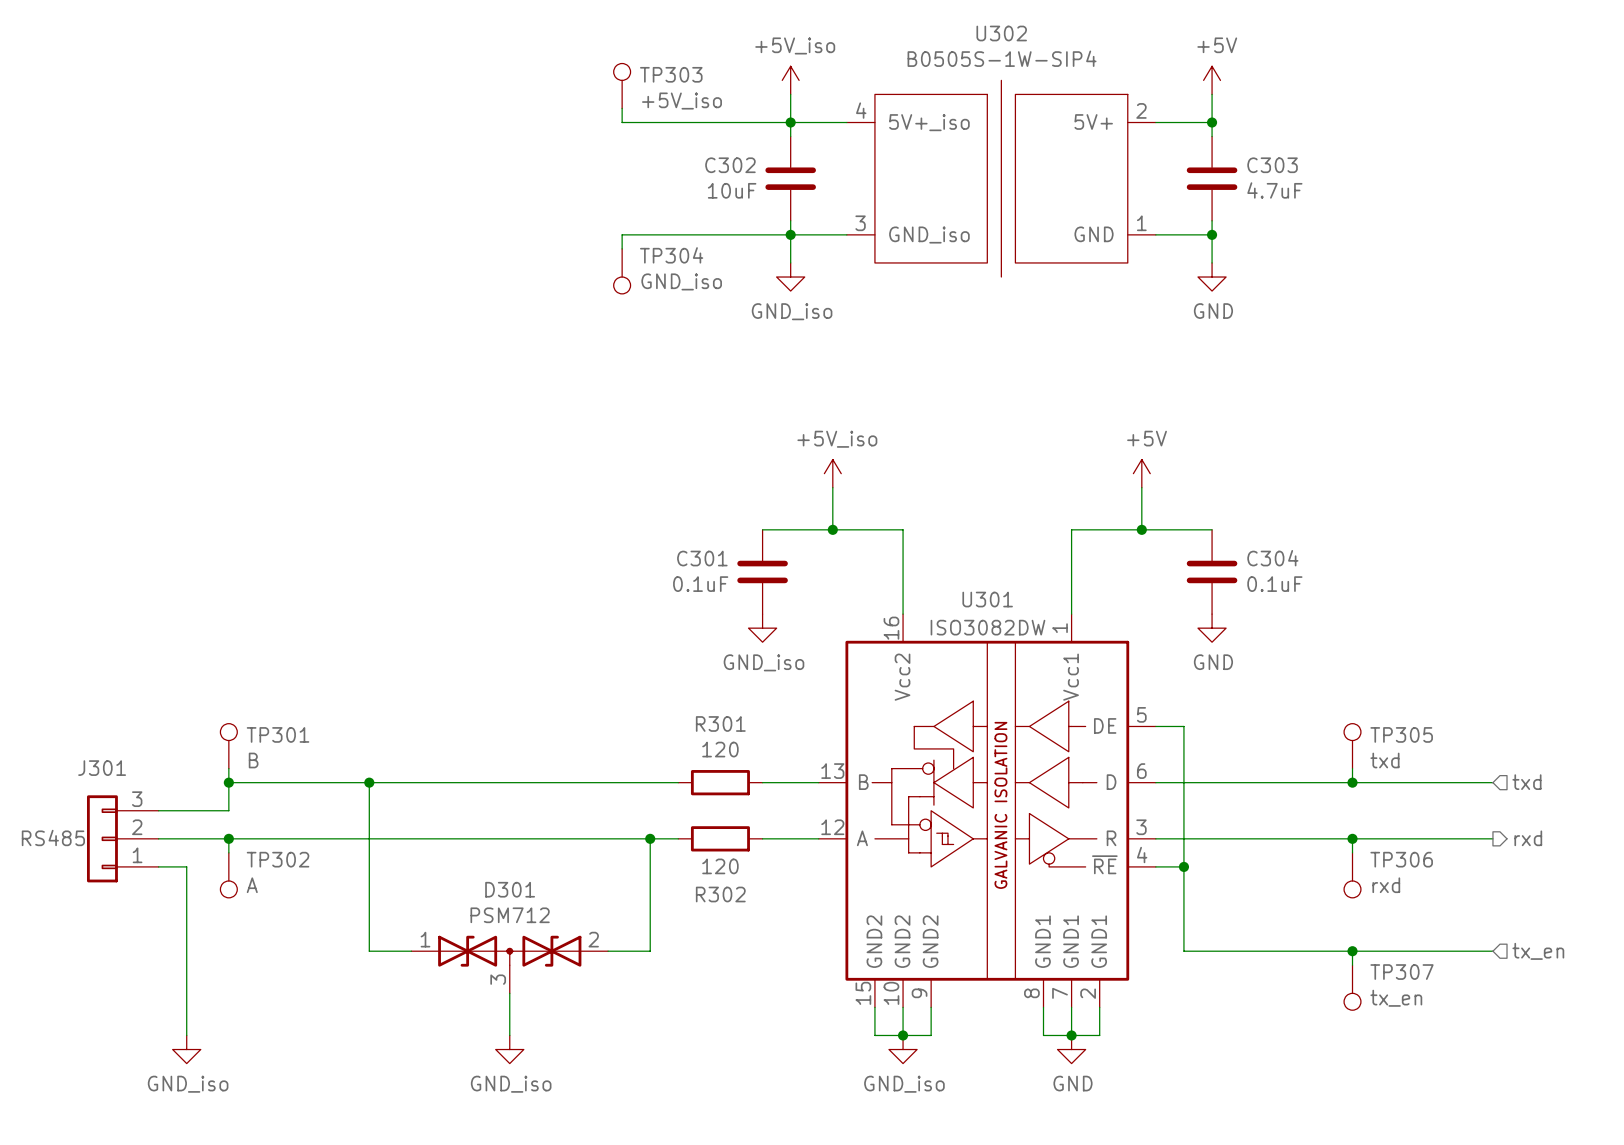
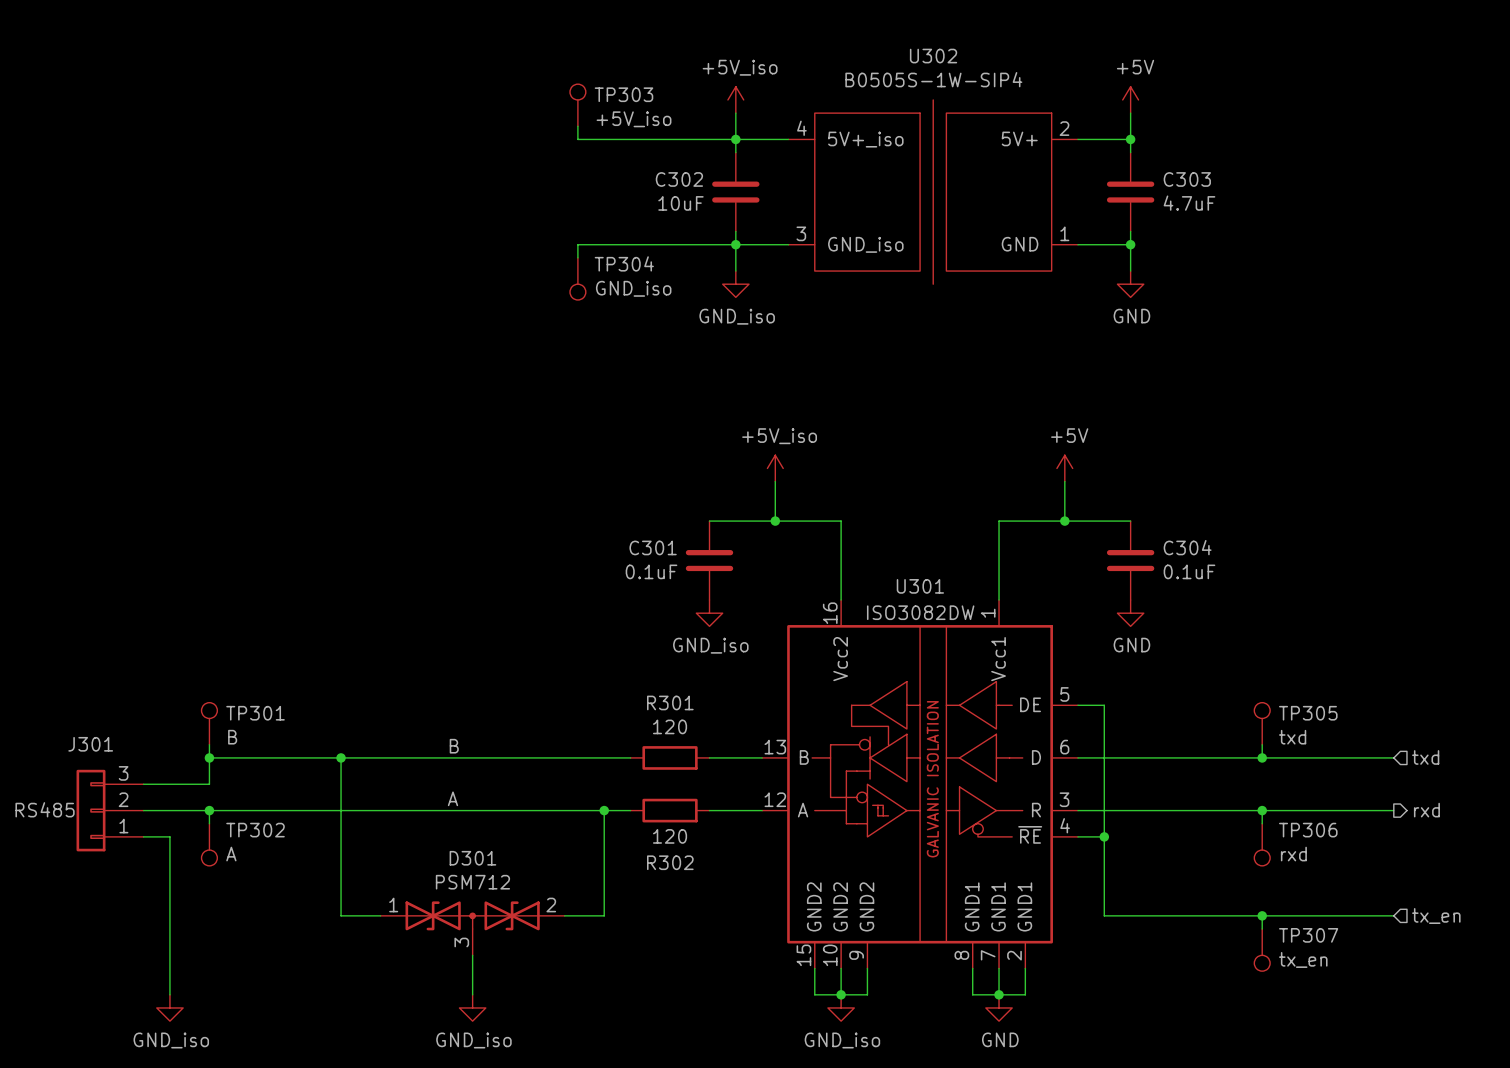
label: none -> B (454, 746)
label: none -> A (452, 798)

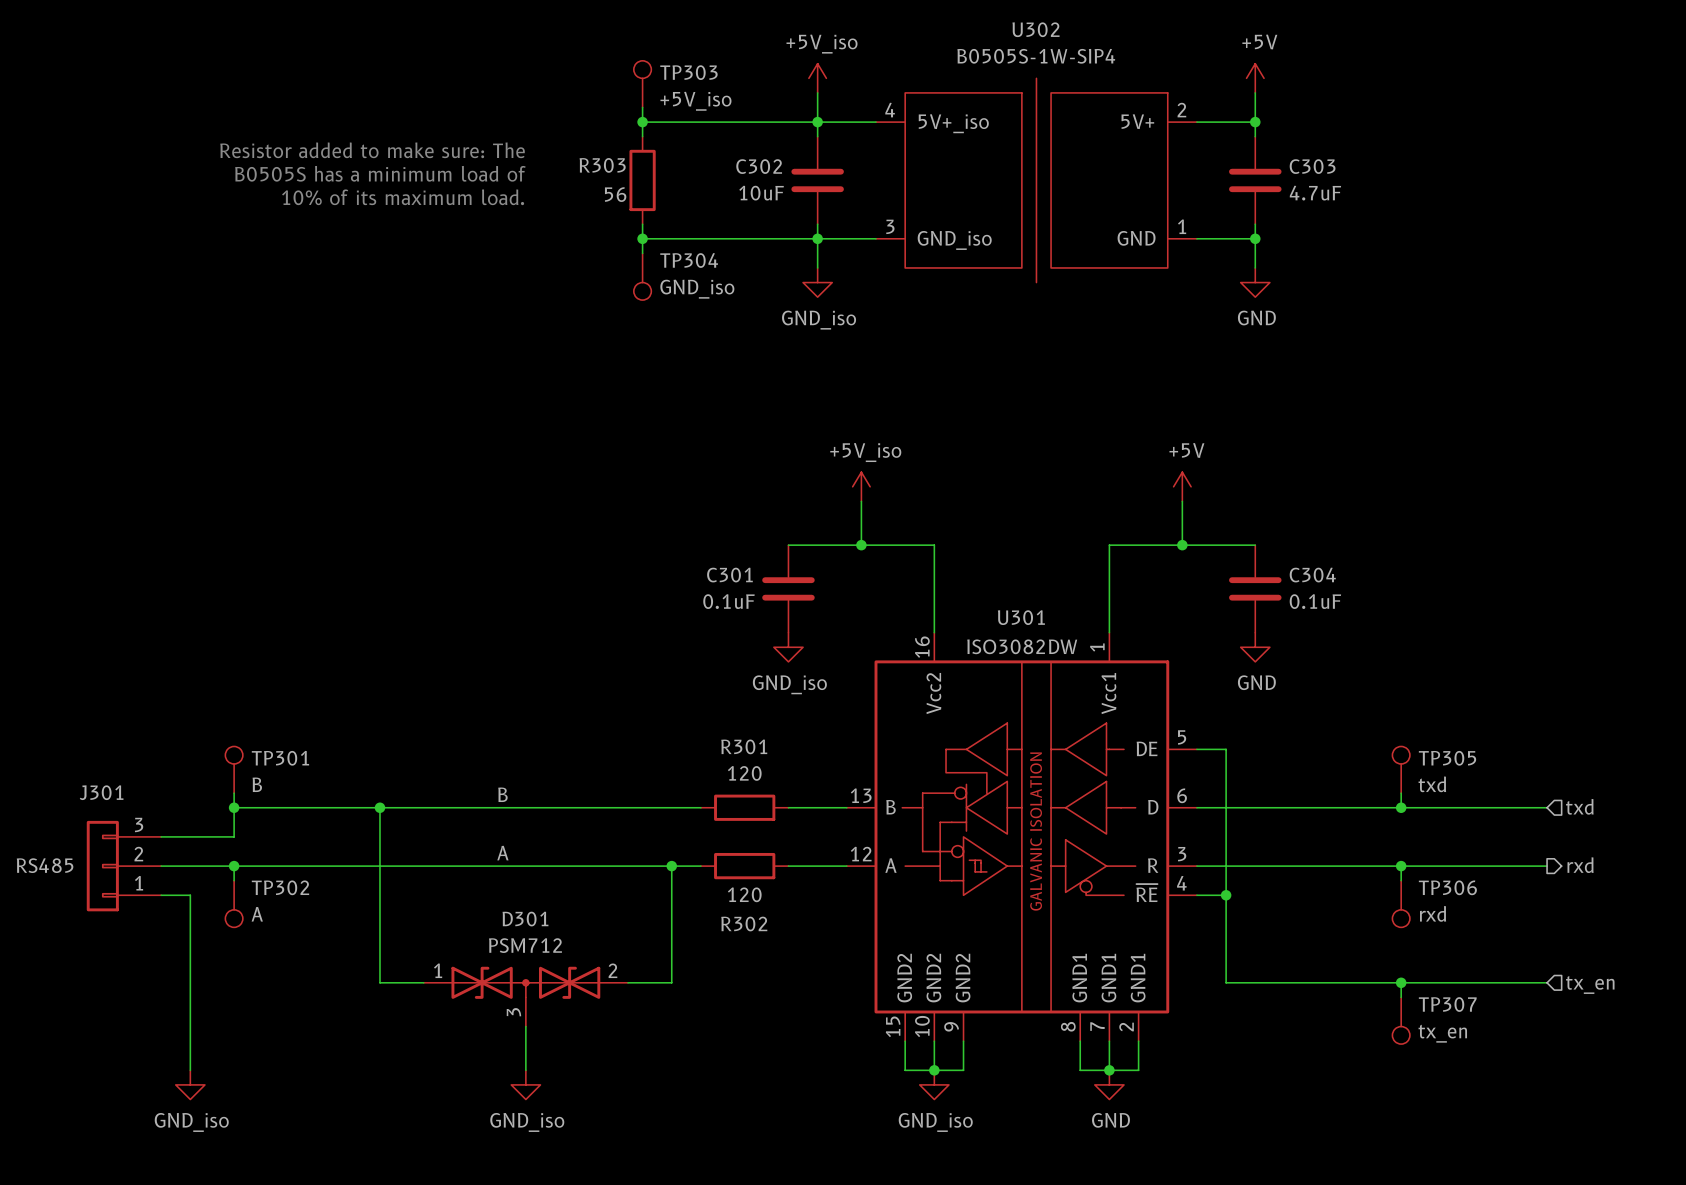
wire: none -> (642, 122) (642, 136)
junction: none -> (642, 122)
text: none -> Resistor added to make sure: The (372, 150)
text: none -> B0505S has a minimum load of (380, 173)
R303: none -> 56 (642, 180)
text: none -> 10% of its maximum load. (403, 197)
wire: none -> (642, 224) (642, 238)
junction: none -> (642, 238)

